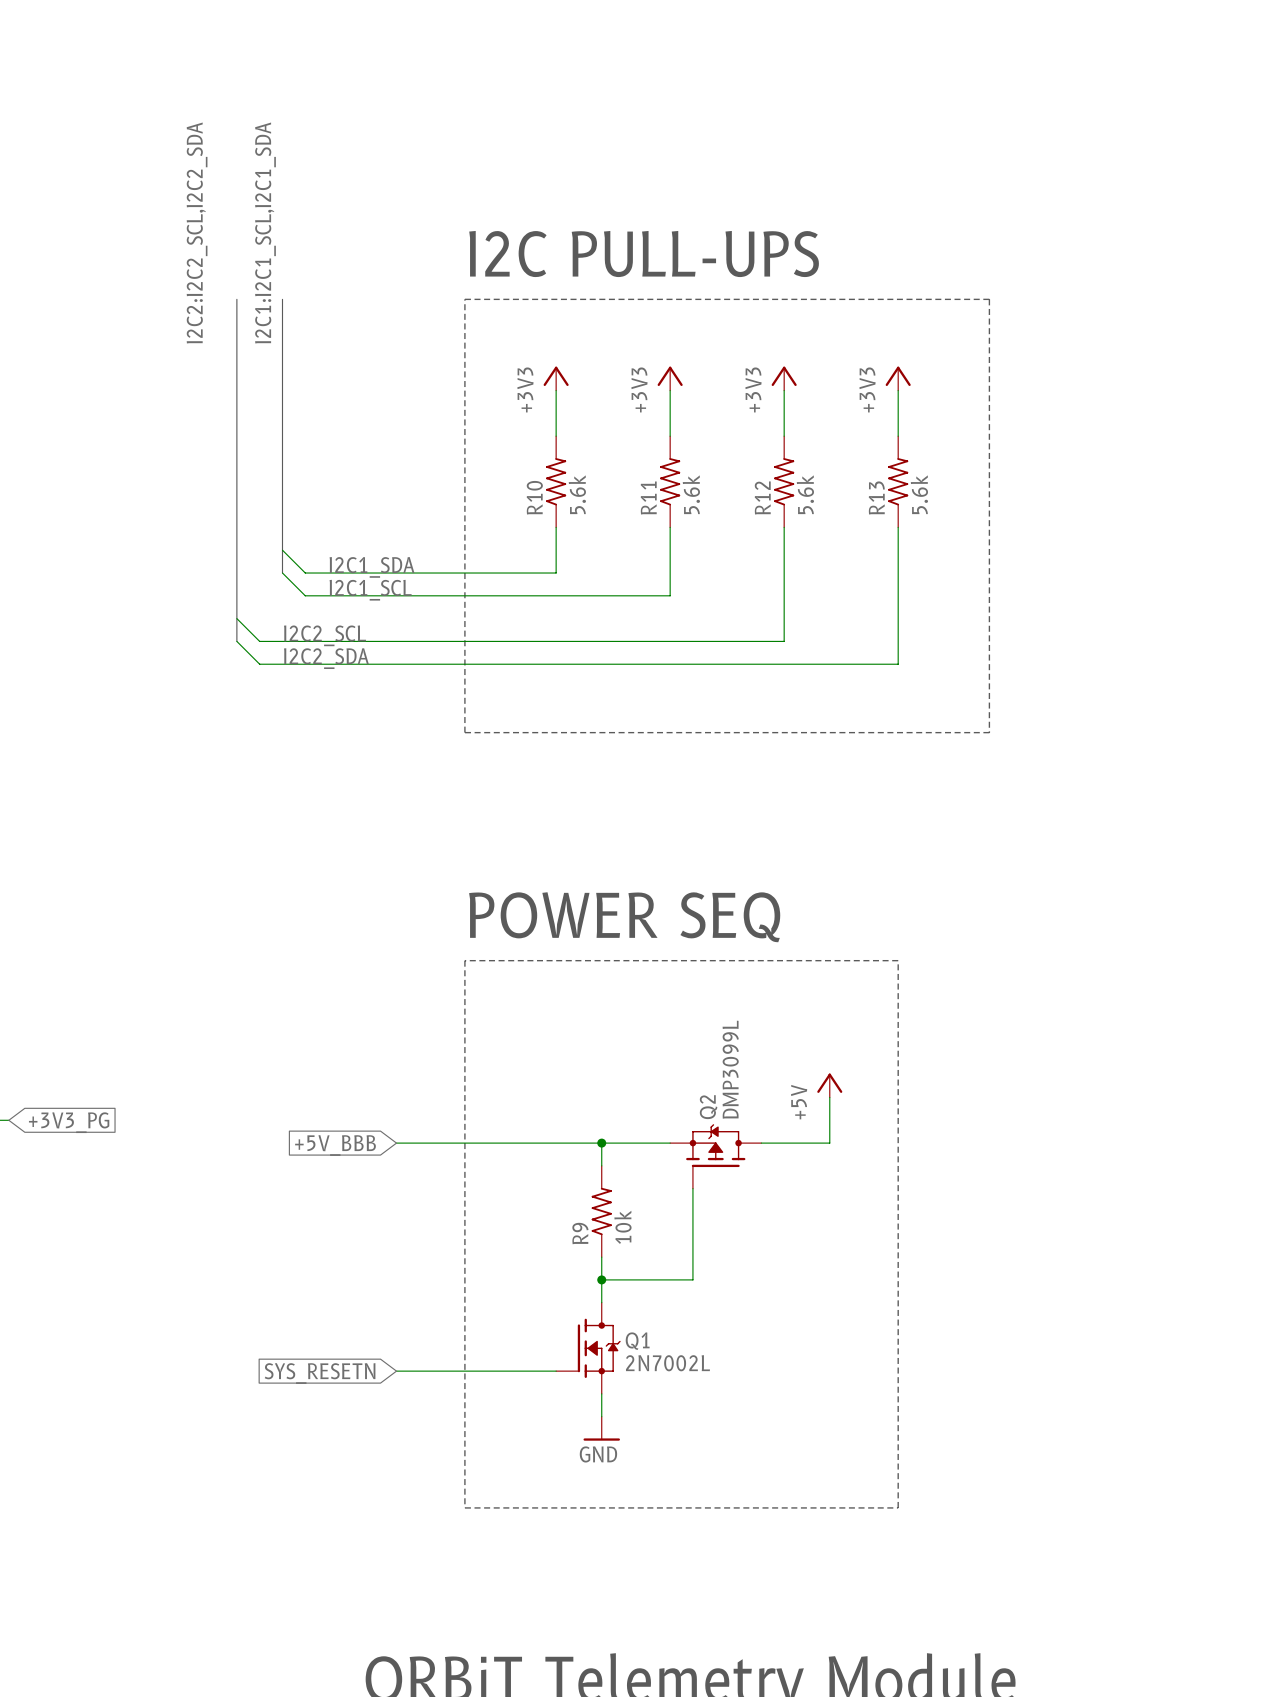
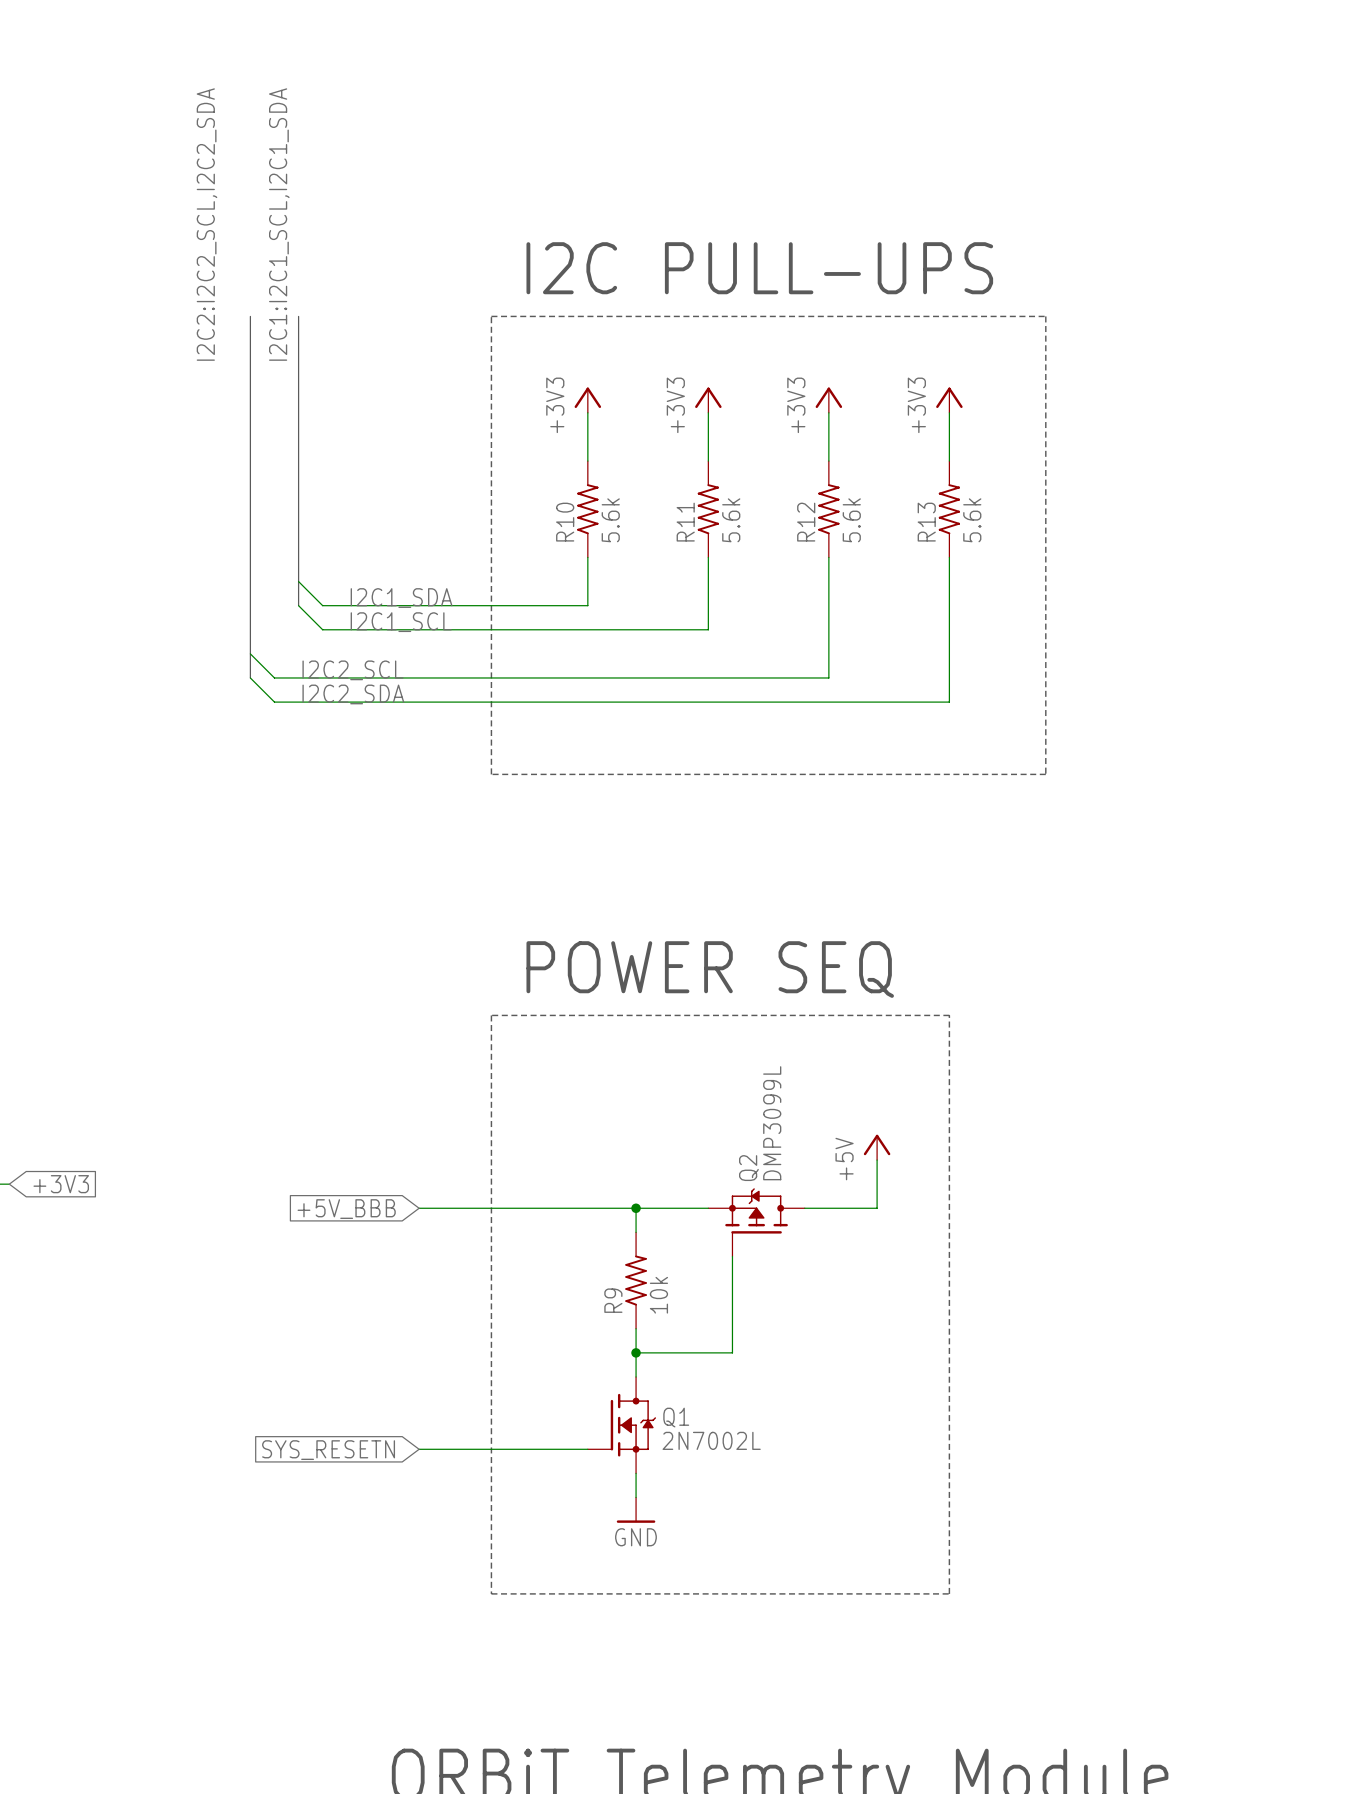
text position: I2C PULL-UPS (644, 254) -> I2C PULL-UPS (759, 268)
text position: POWER SEQ (624, 917) -> POWER SEQ (710, 969)
global label: +3V3_PG (69, 1122) -> +3V3 (61, 1184)

